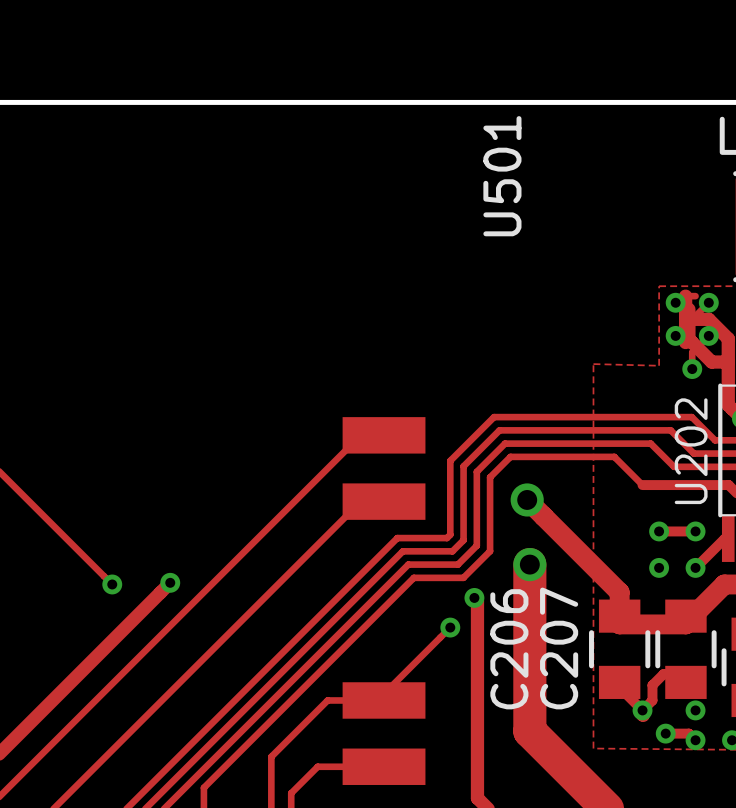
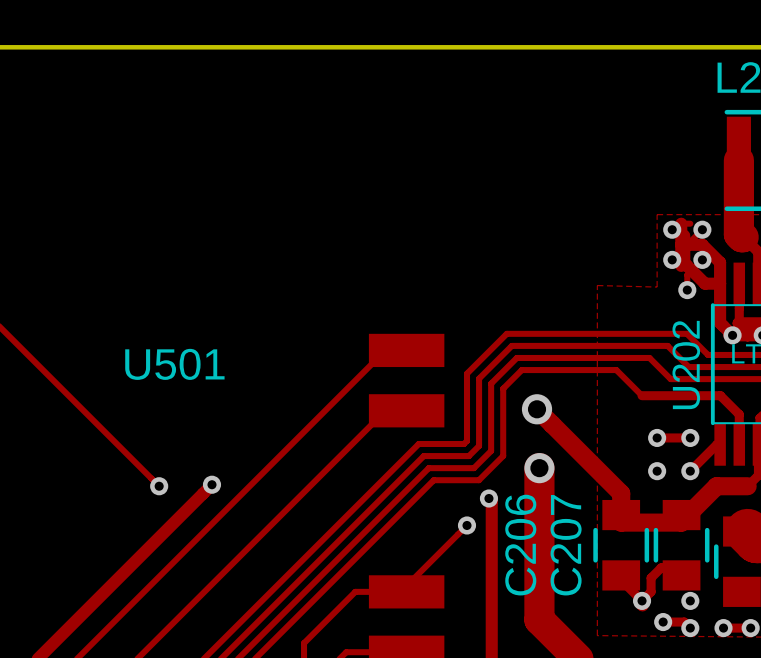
U501 name rotation: 0° (502, 176) -> 90° clockwise (174, 364)
U501 name position: U501 (502, 176) -> U501 (174, 364)

